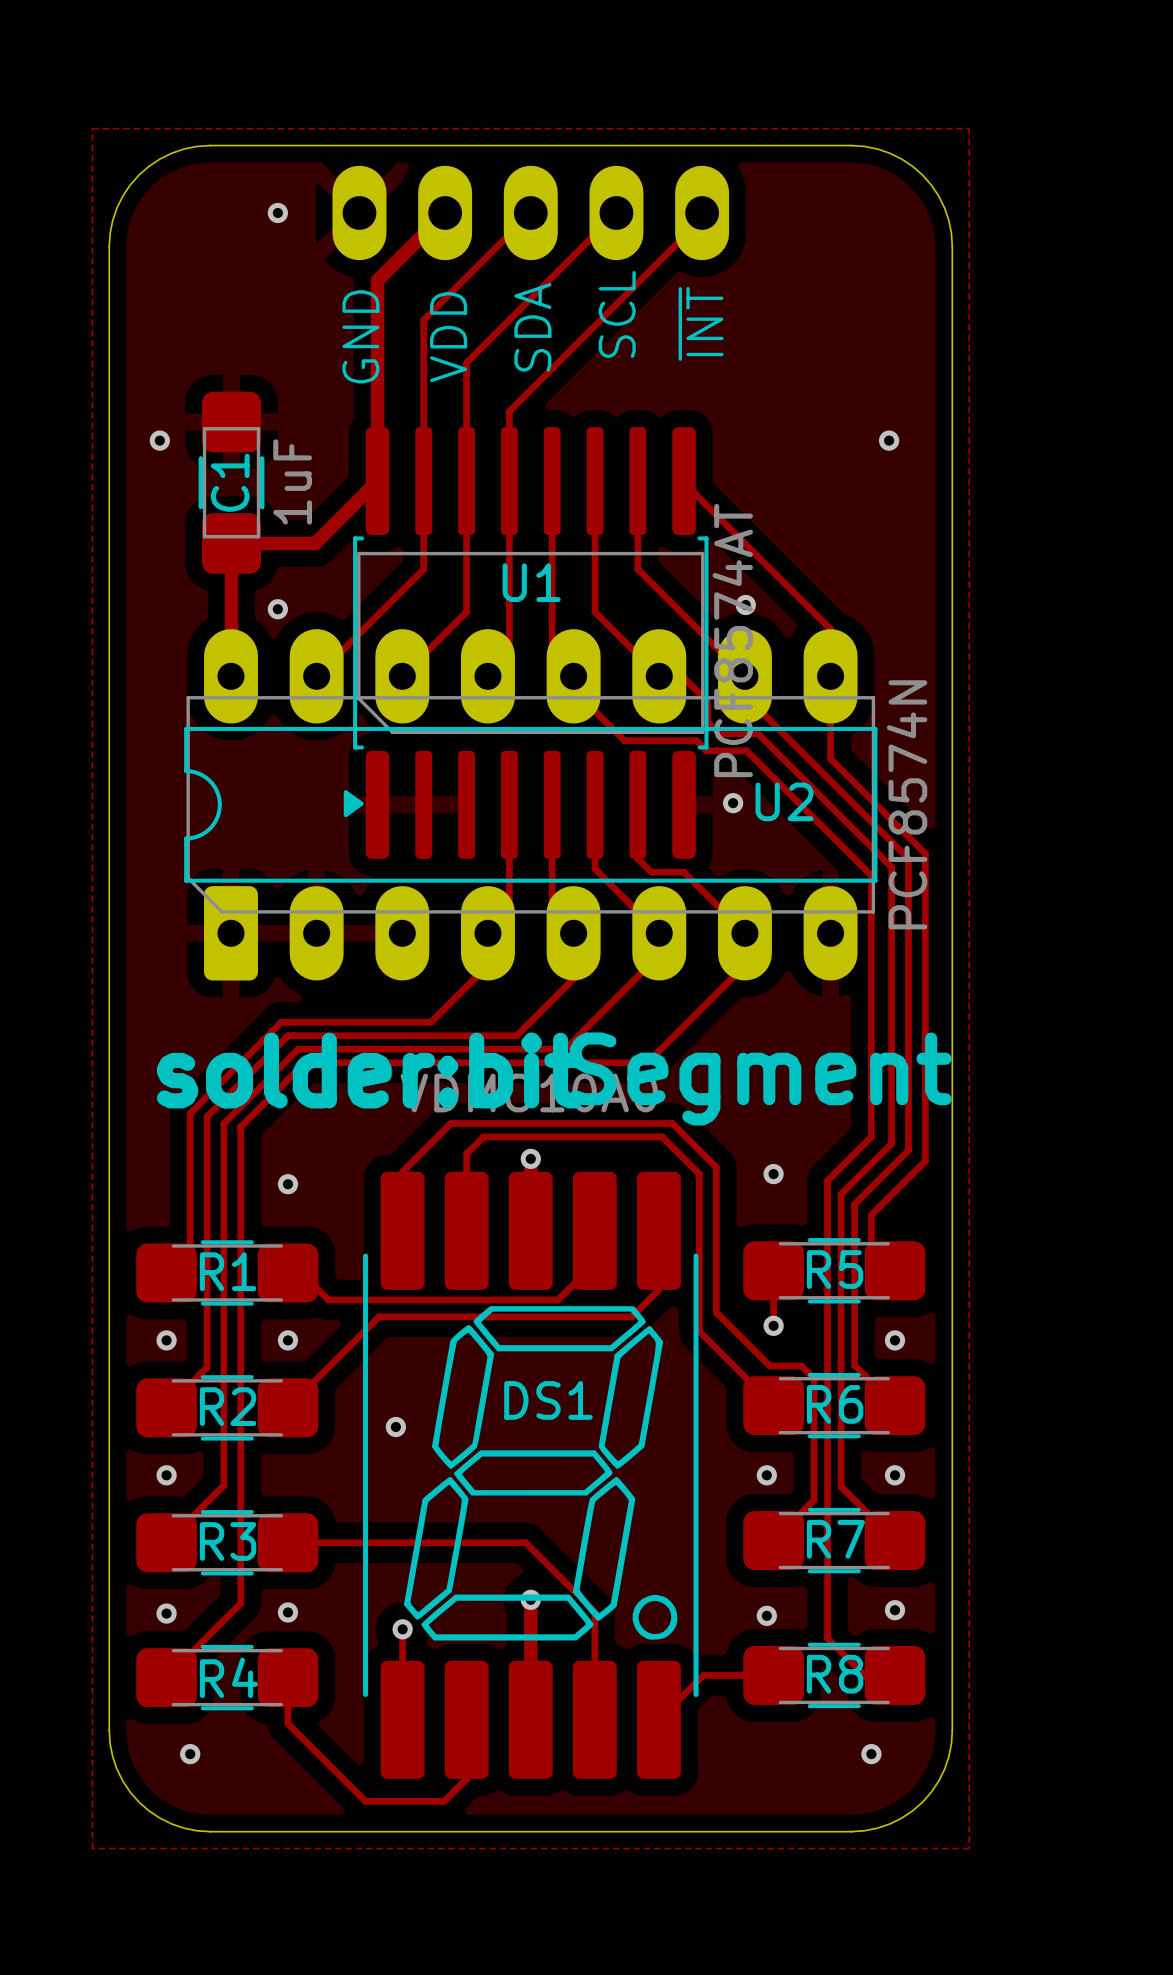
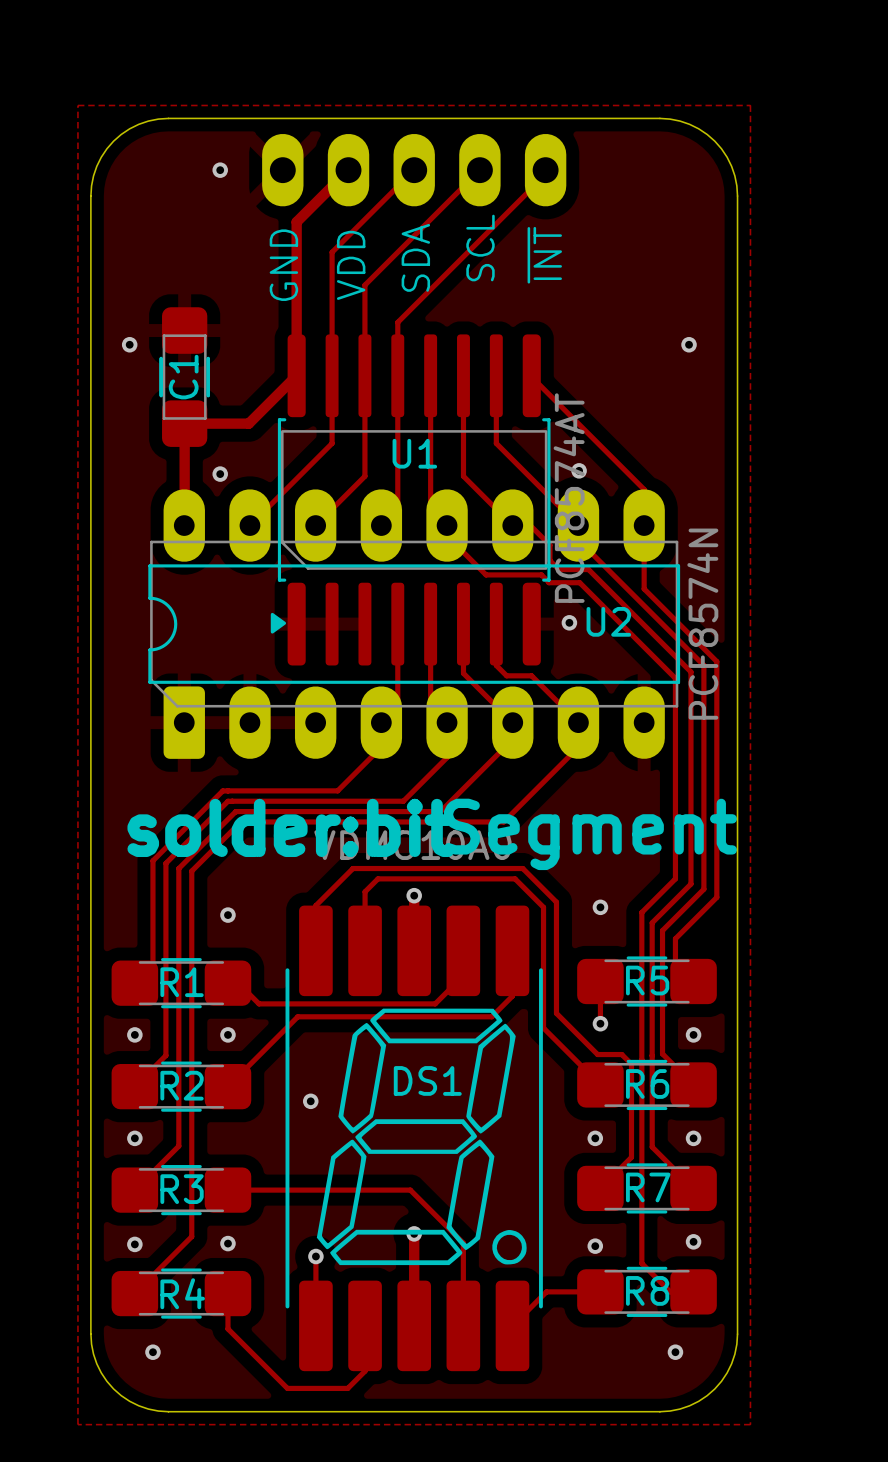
C1 value: 1uF (292, 481) -> none

